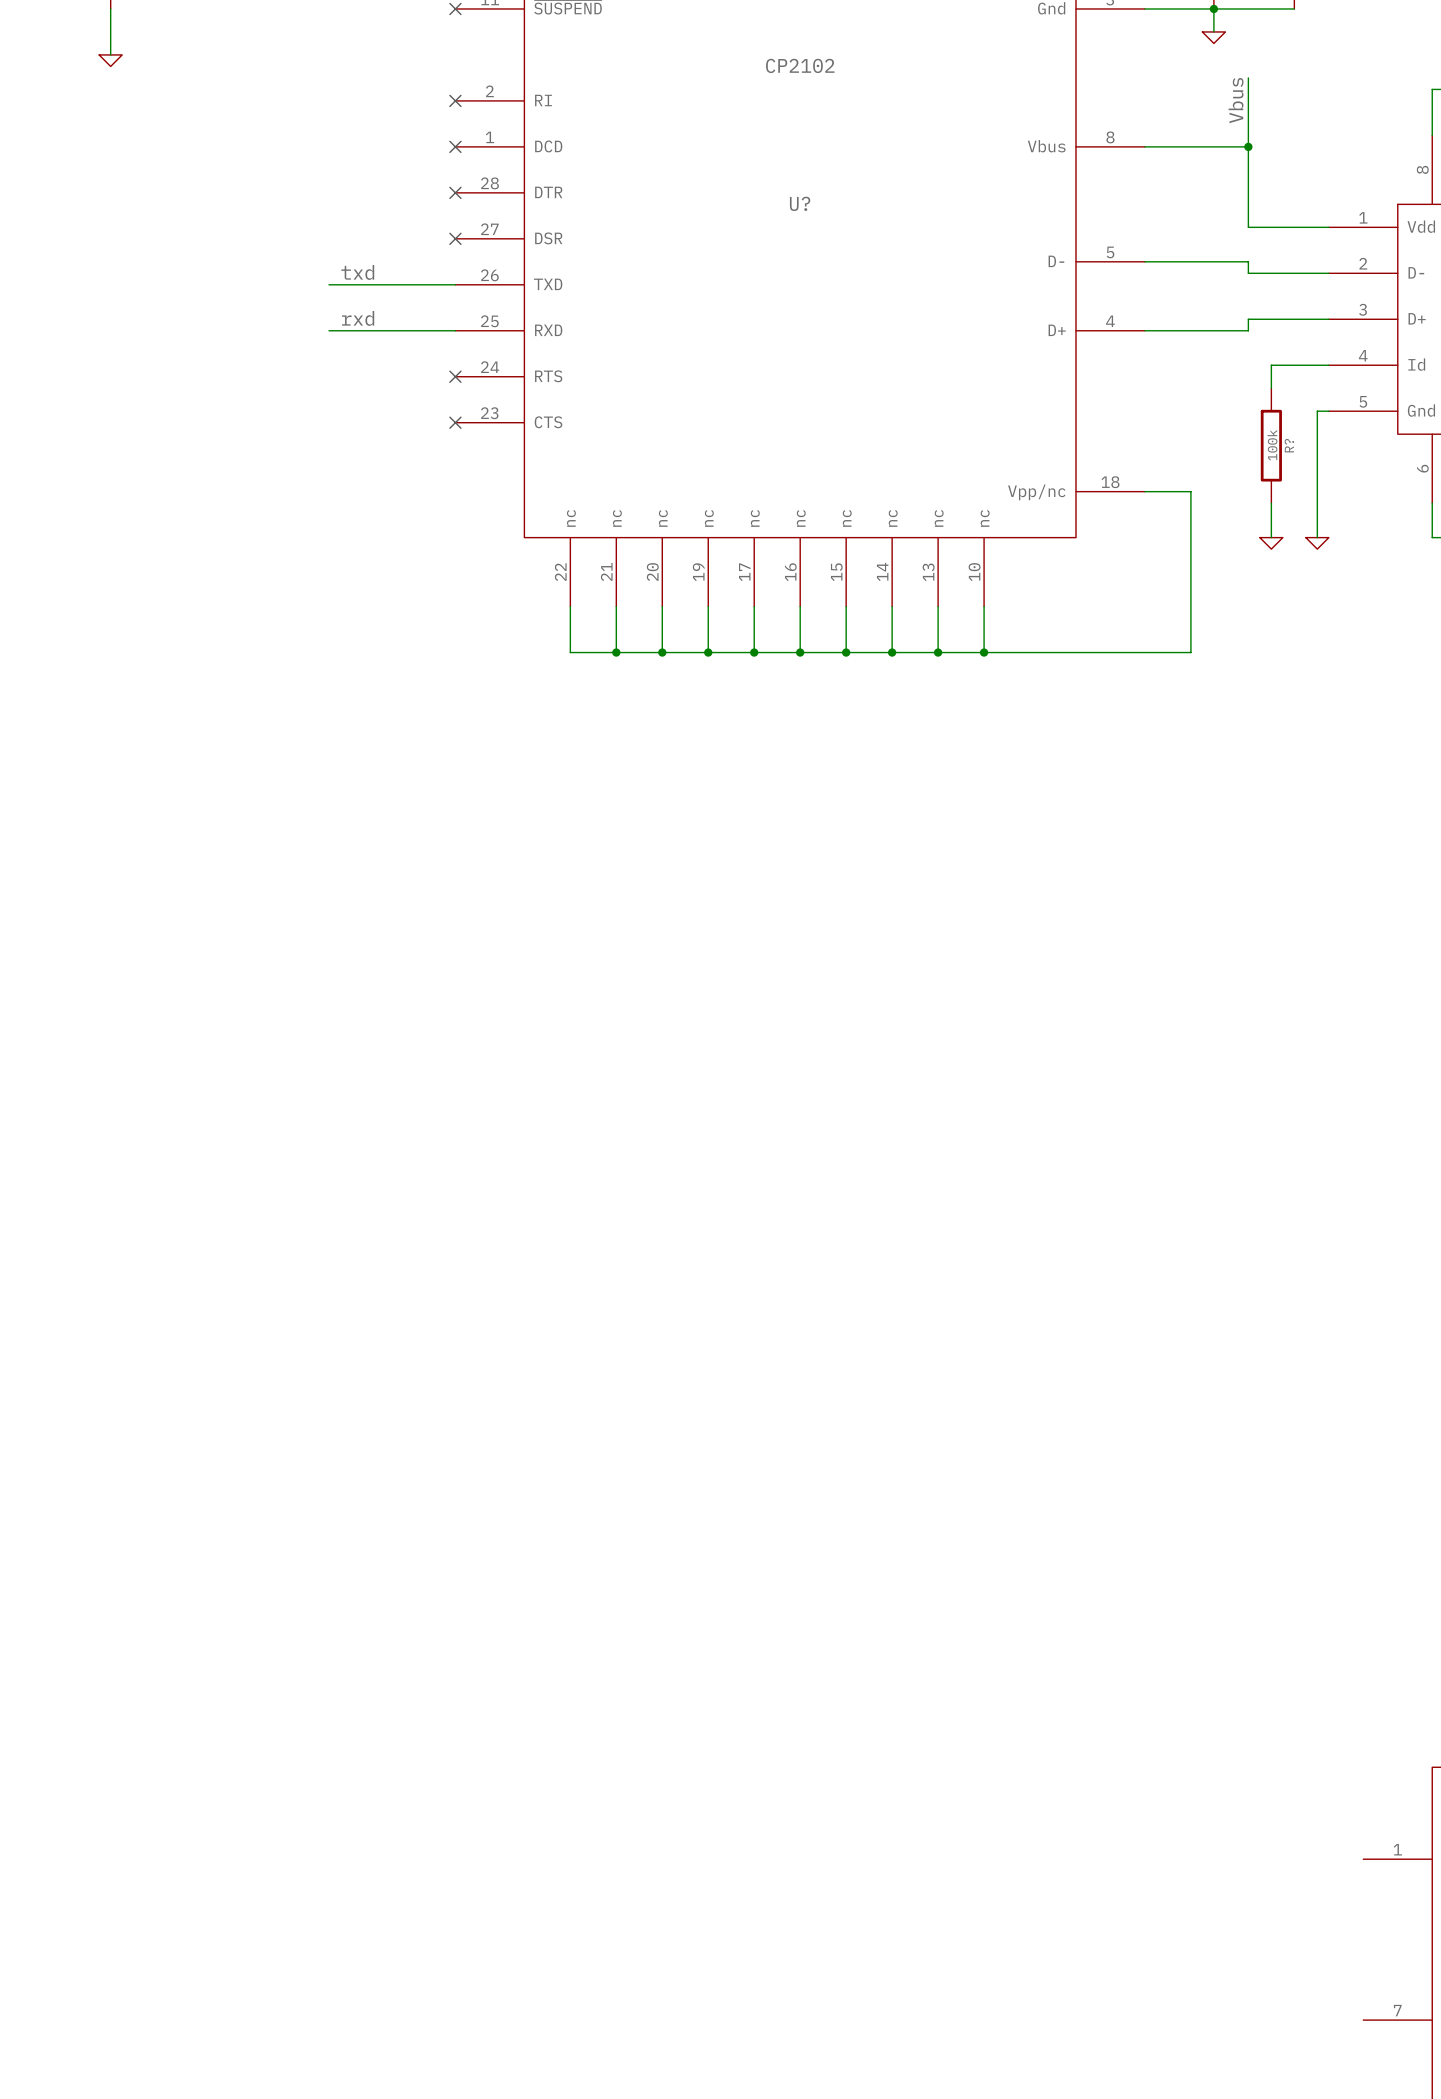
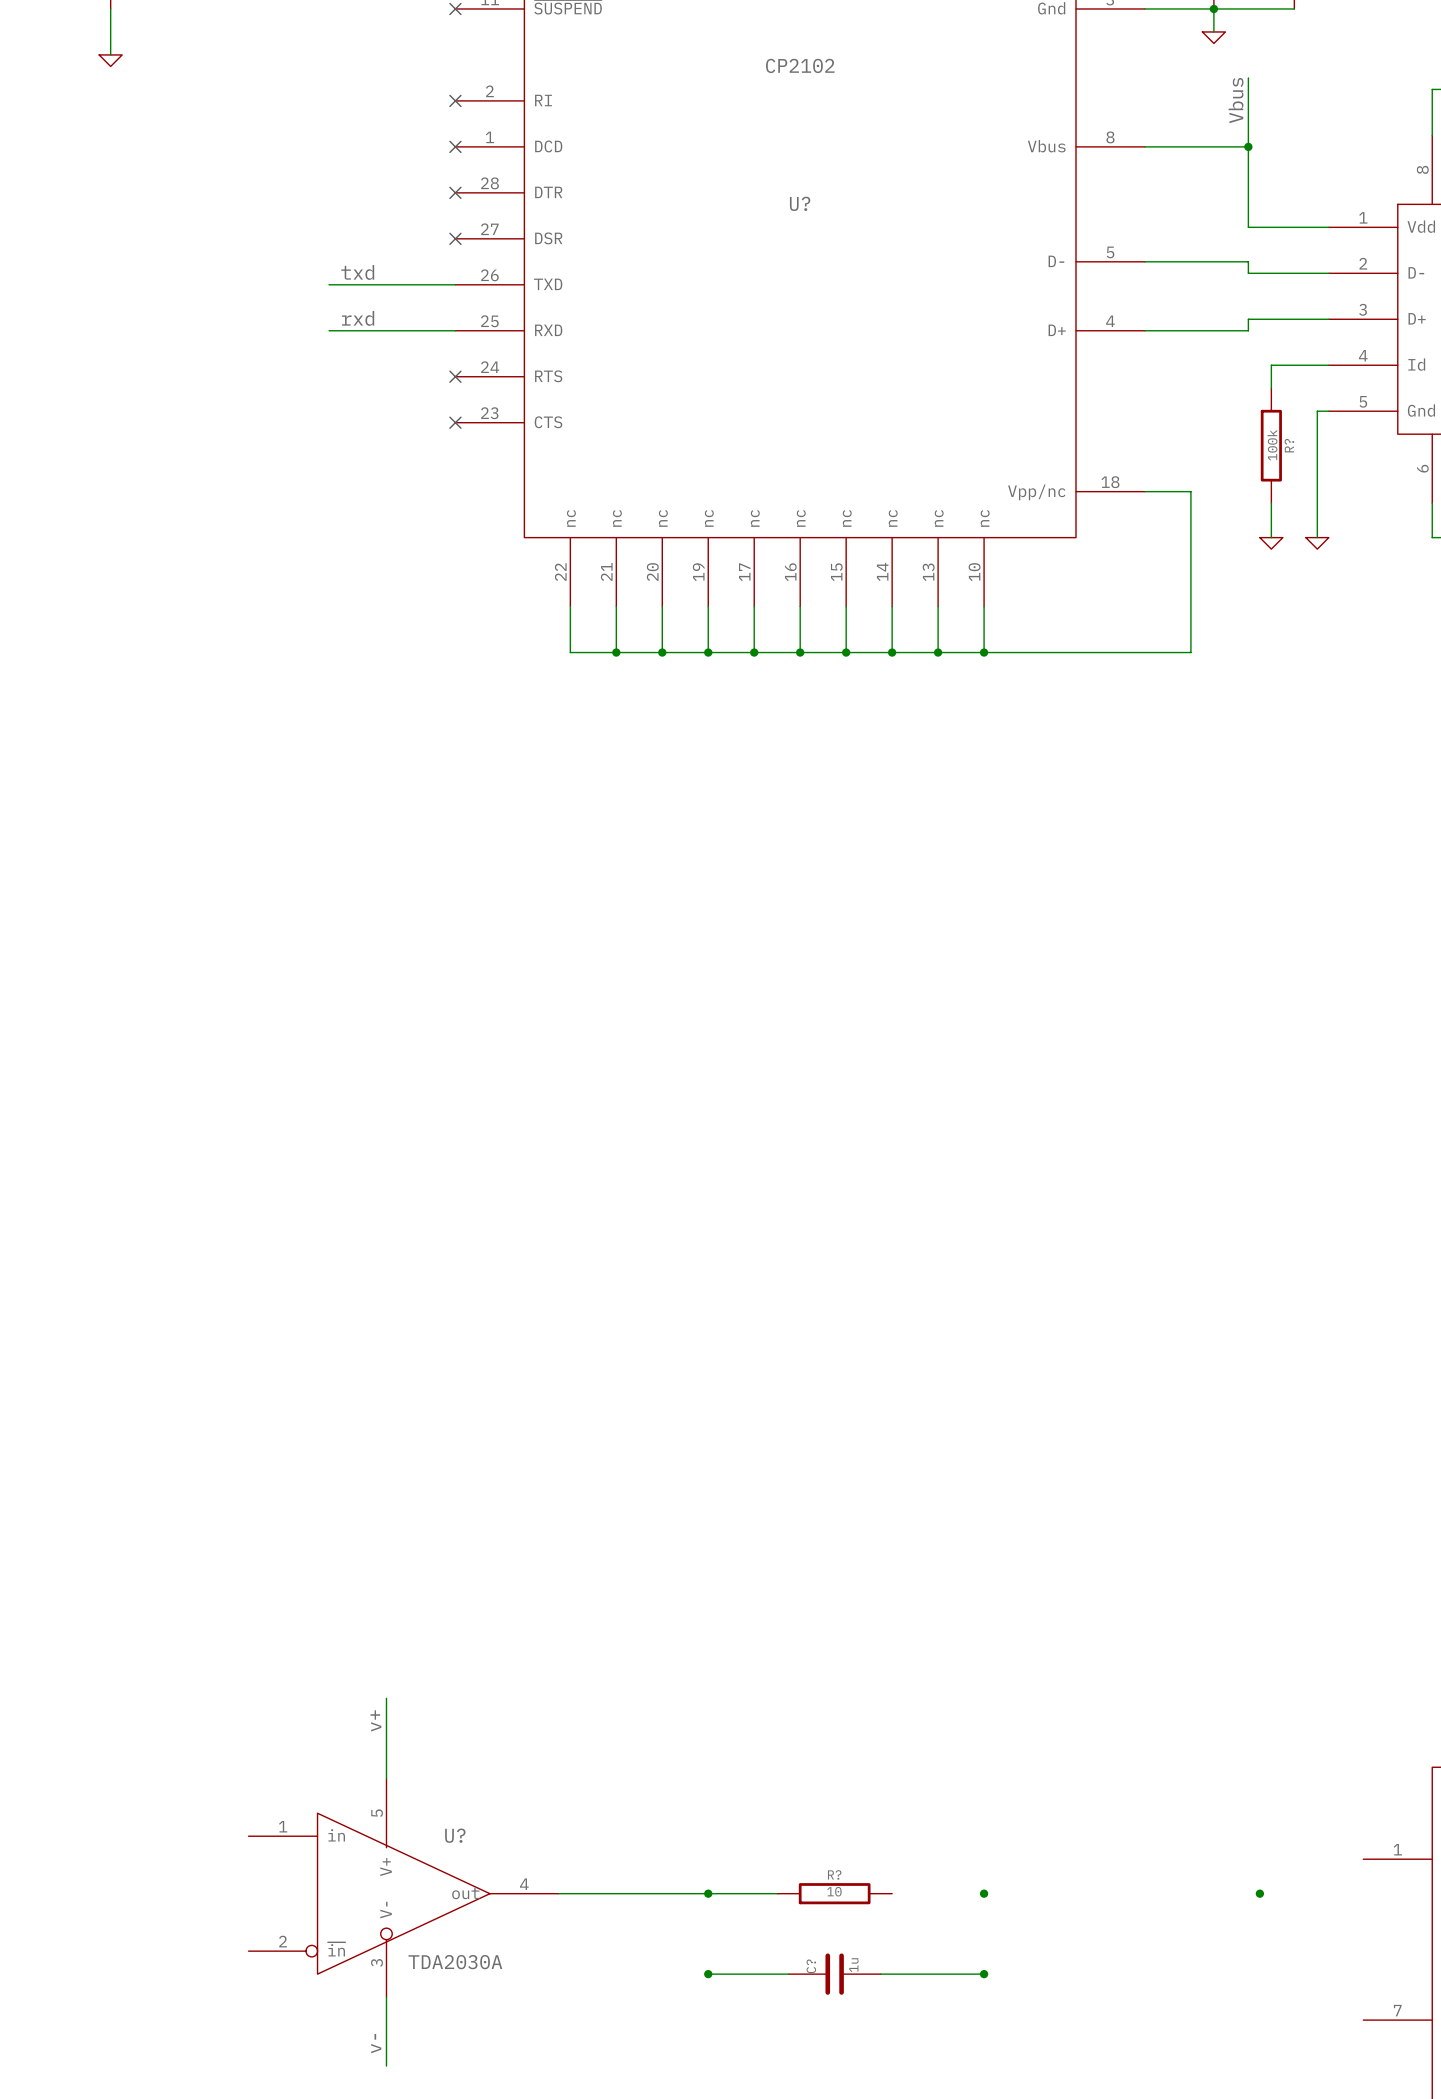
wire: none -> (386, 1698) (386, 1778)
label: none -> v+ (375, 1720)
U?: none -> TDA2030A (403, 1887)
wire: none -> (558, 1893) (777, 1893)
junction: none -> (708, 1893)
R?: none -> 10 (834, 1893)
junction: none -> (984, 1893)
junction: none -> (1259, 1893)
wire: none -> (708, 1974) (788, 1974)
junction: none -> (708, 1974)
C?: none -> 1u (834, 1974)
wire: none -> (880, 1974) (984, 1974)
junction: none -> (984, 1974)
wire: none -> (386, 1997) (386, 2066)
label: none -> v- (376, 2043)

